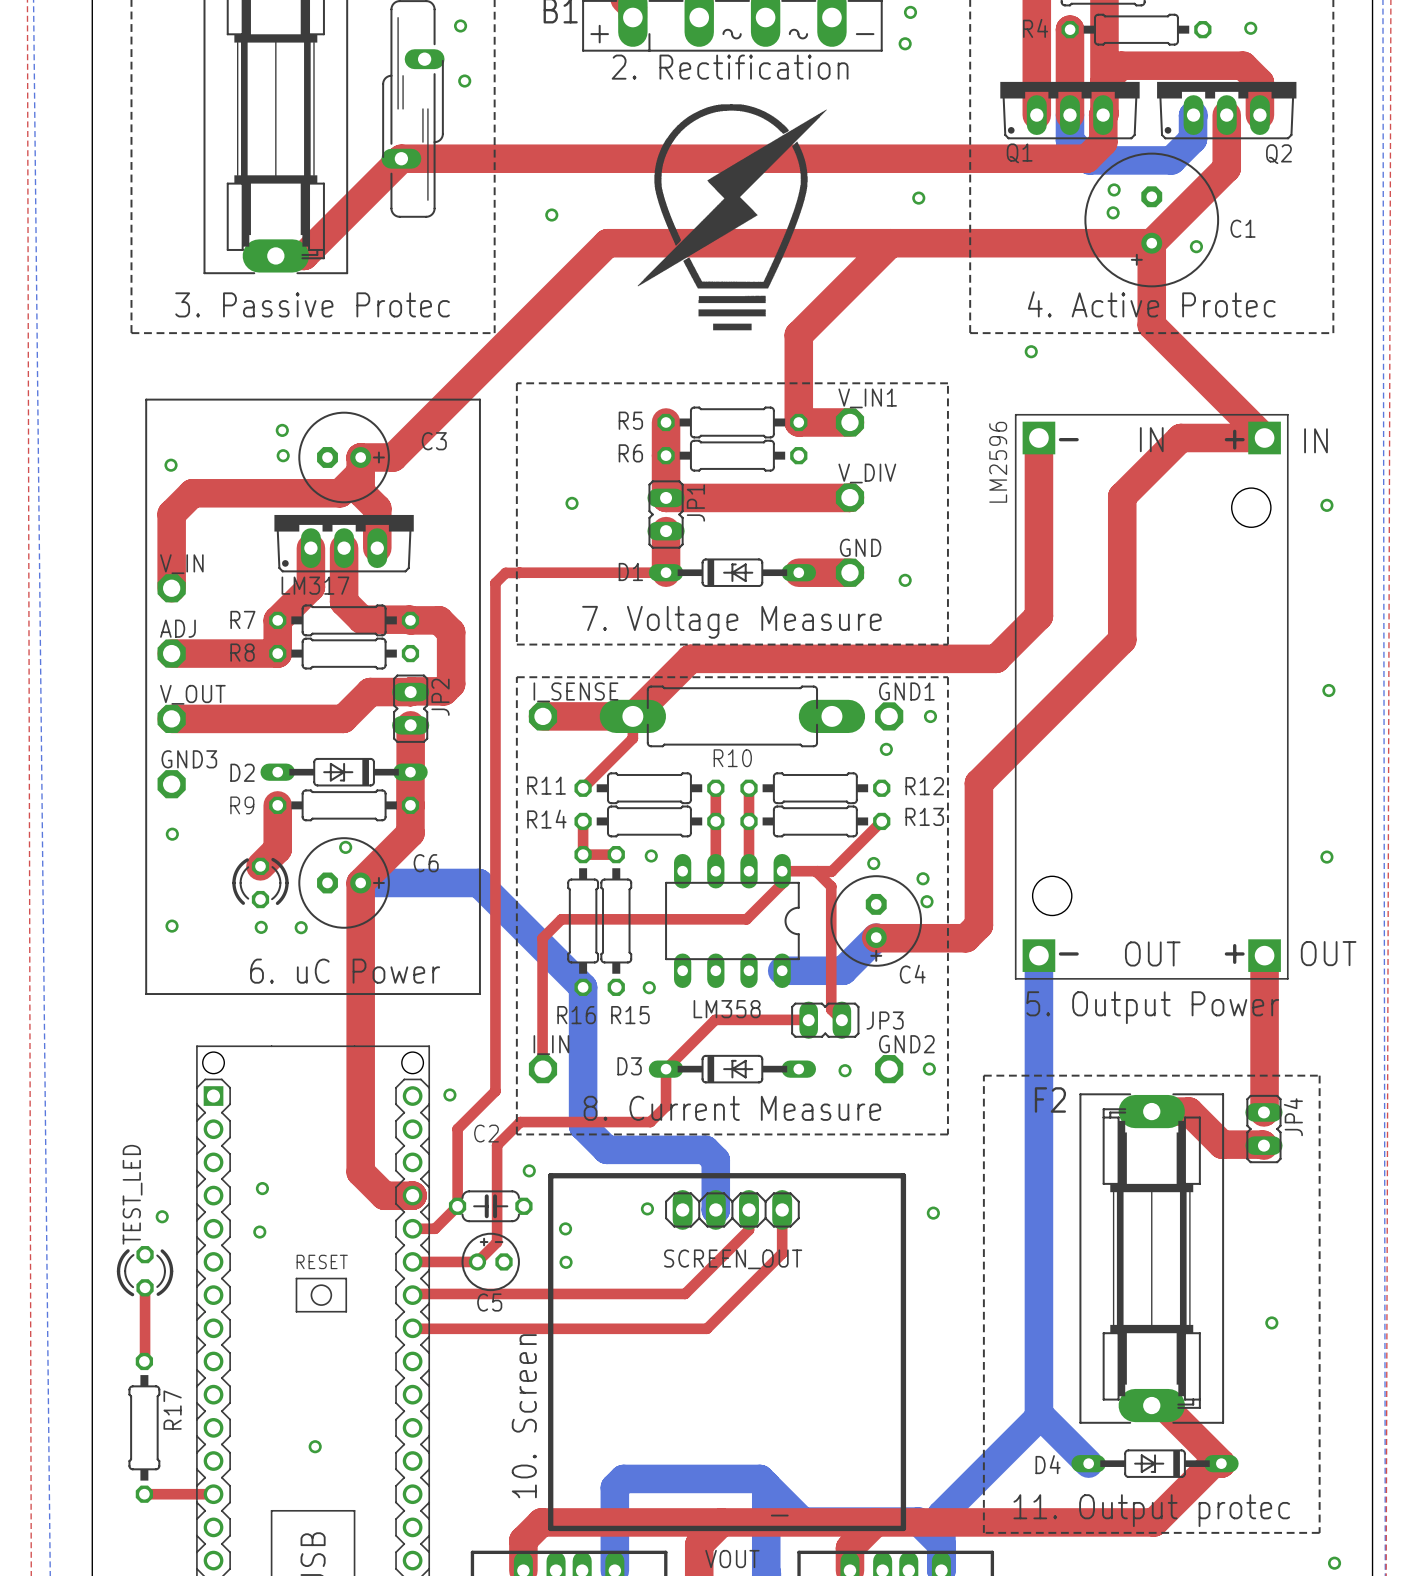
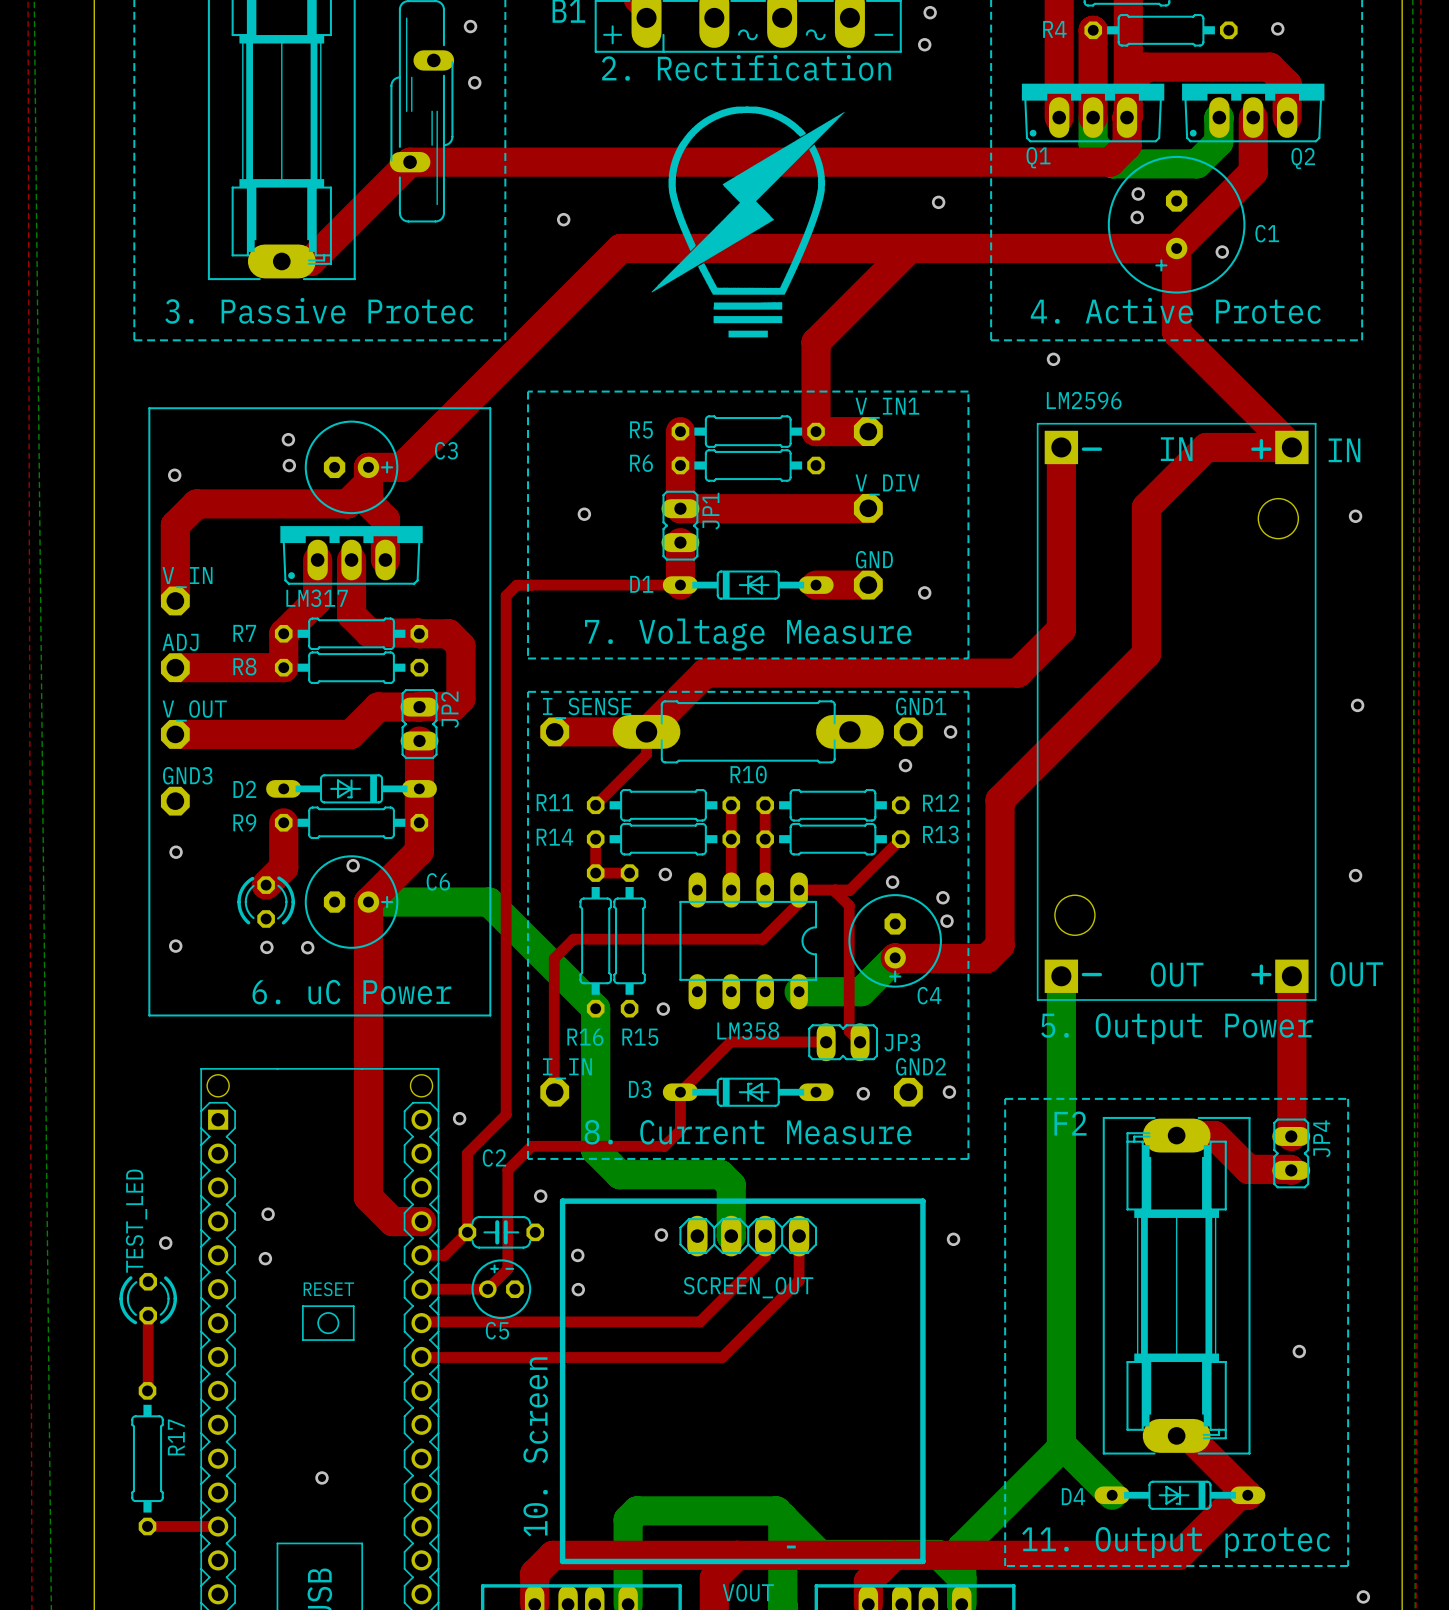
LM2596 name rotation: 0° (998, 462) -> 90° clockwise (1084, 400)

